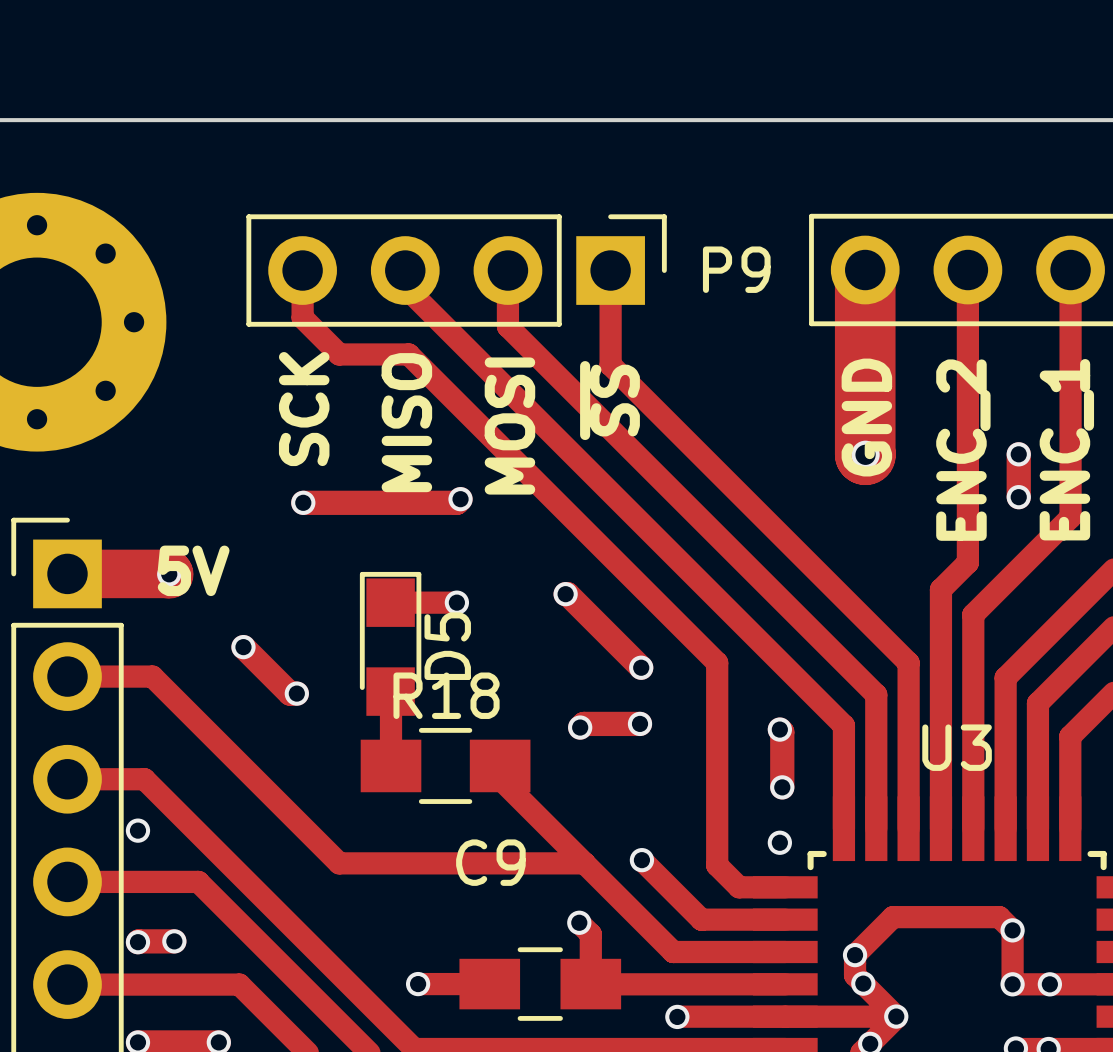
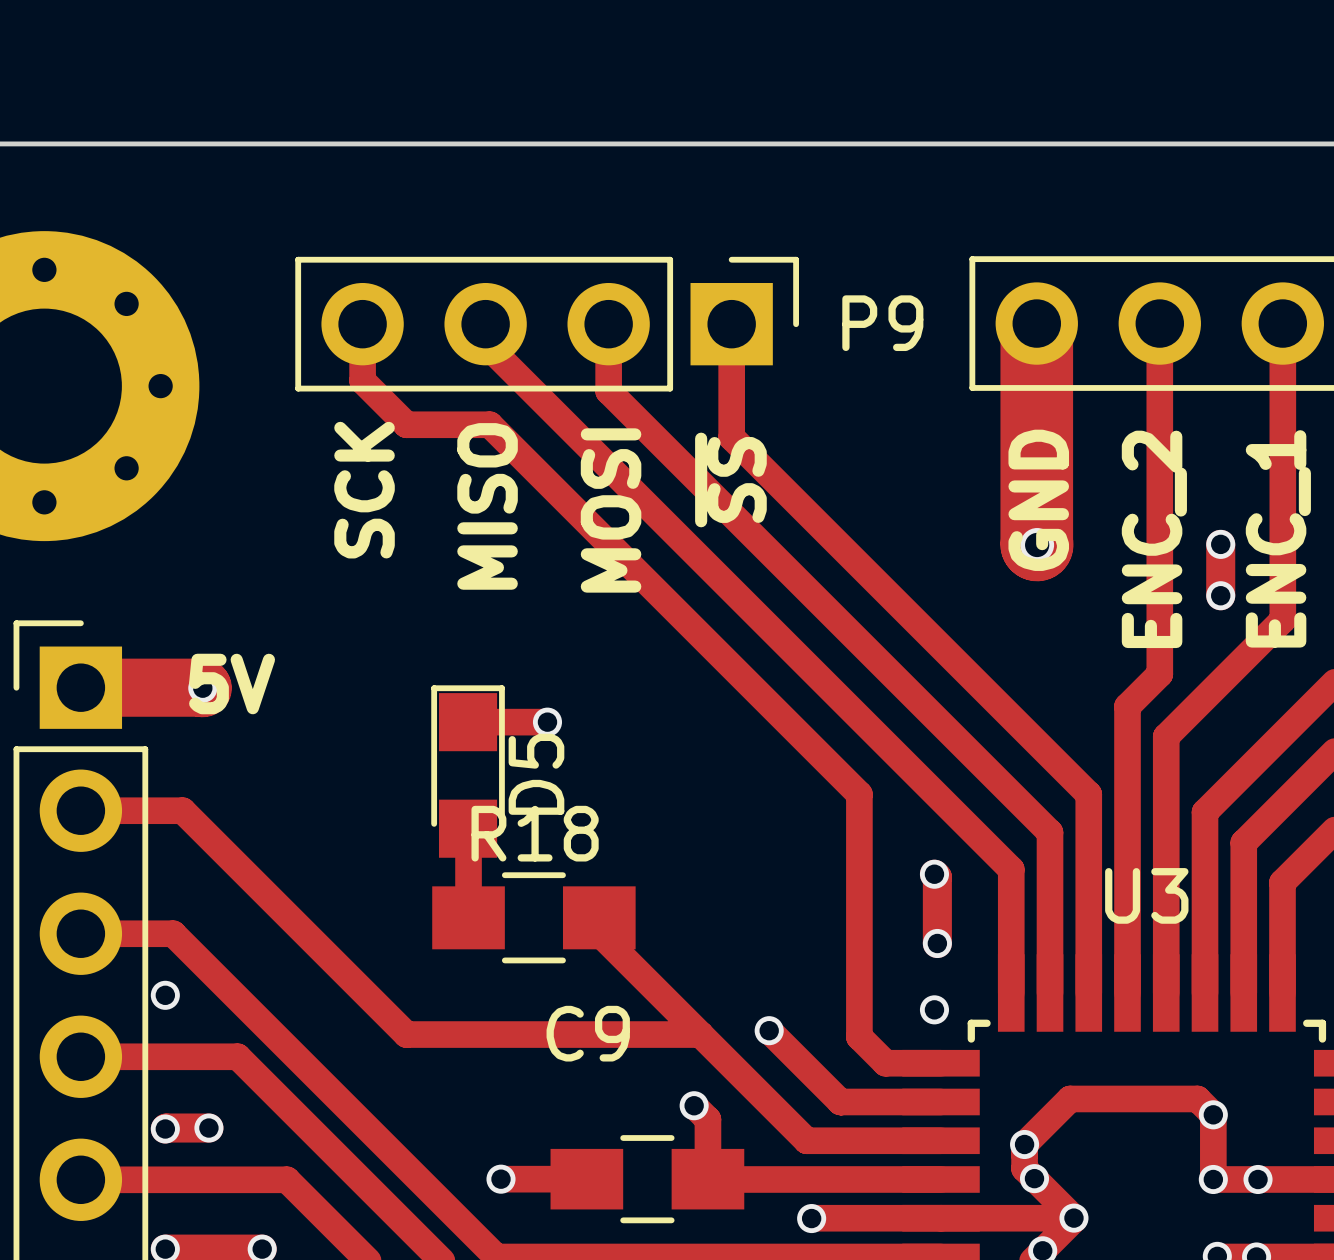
track: (460, 499) (456, 502) (303, 502) -> none
via: (460, 499) -> none
via: (303, 502) -> none
track: (565, 594) (641, 667) -> none
via: (565, 594) -> none
track: (243, 647) (289, 693) (296, 693) -> none
via: (243, 647) -> none
via: (641, 667) -> none
via: (296, 693) -> none
track: (640, 723) (583, 723) (580, 727) -> none
via: (640, 723) -> none
via: (580, 727) -> none

